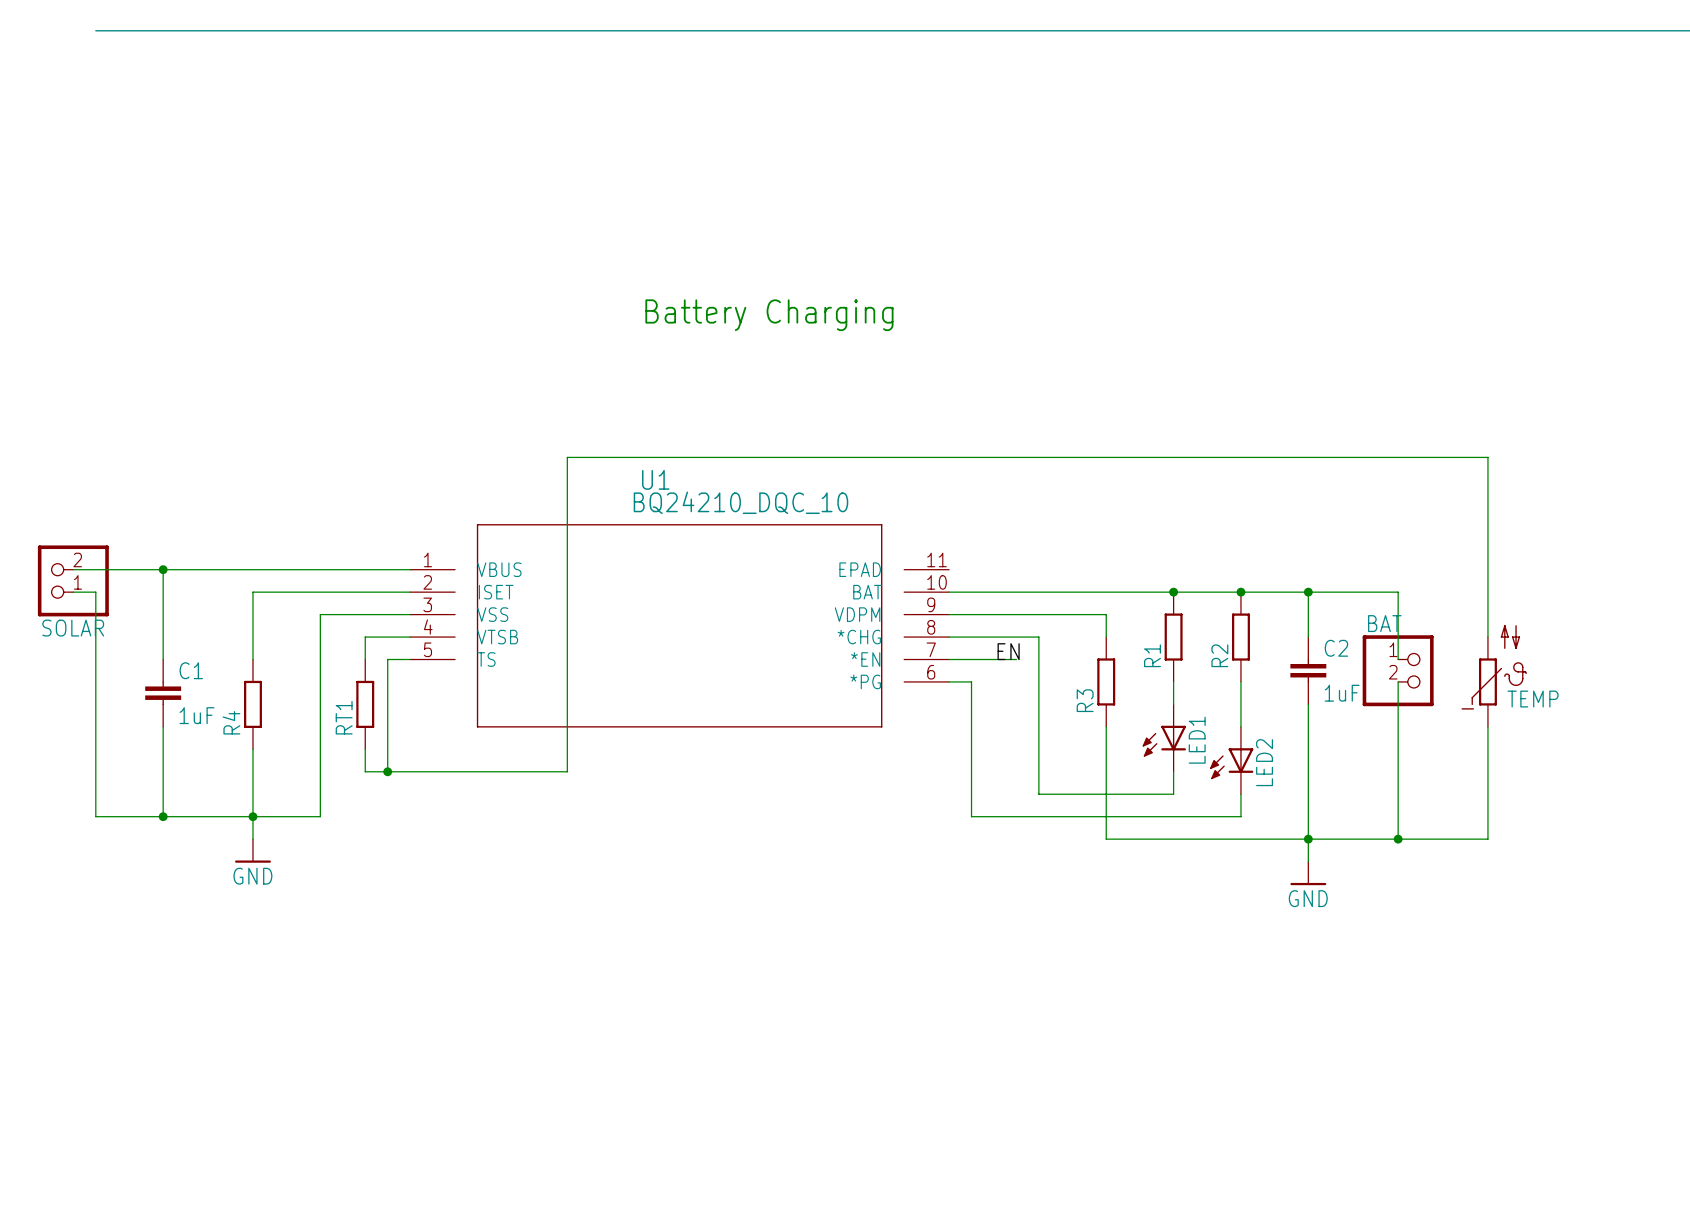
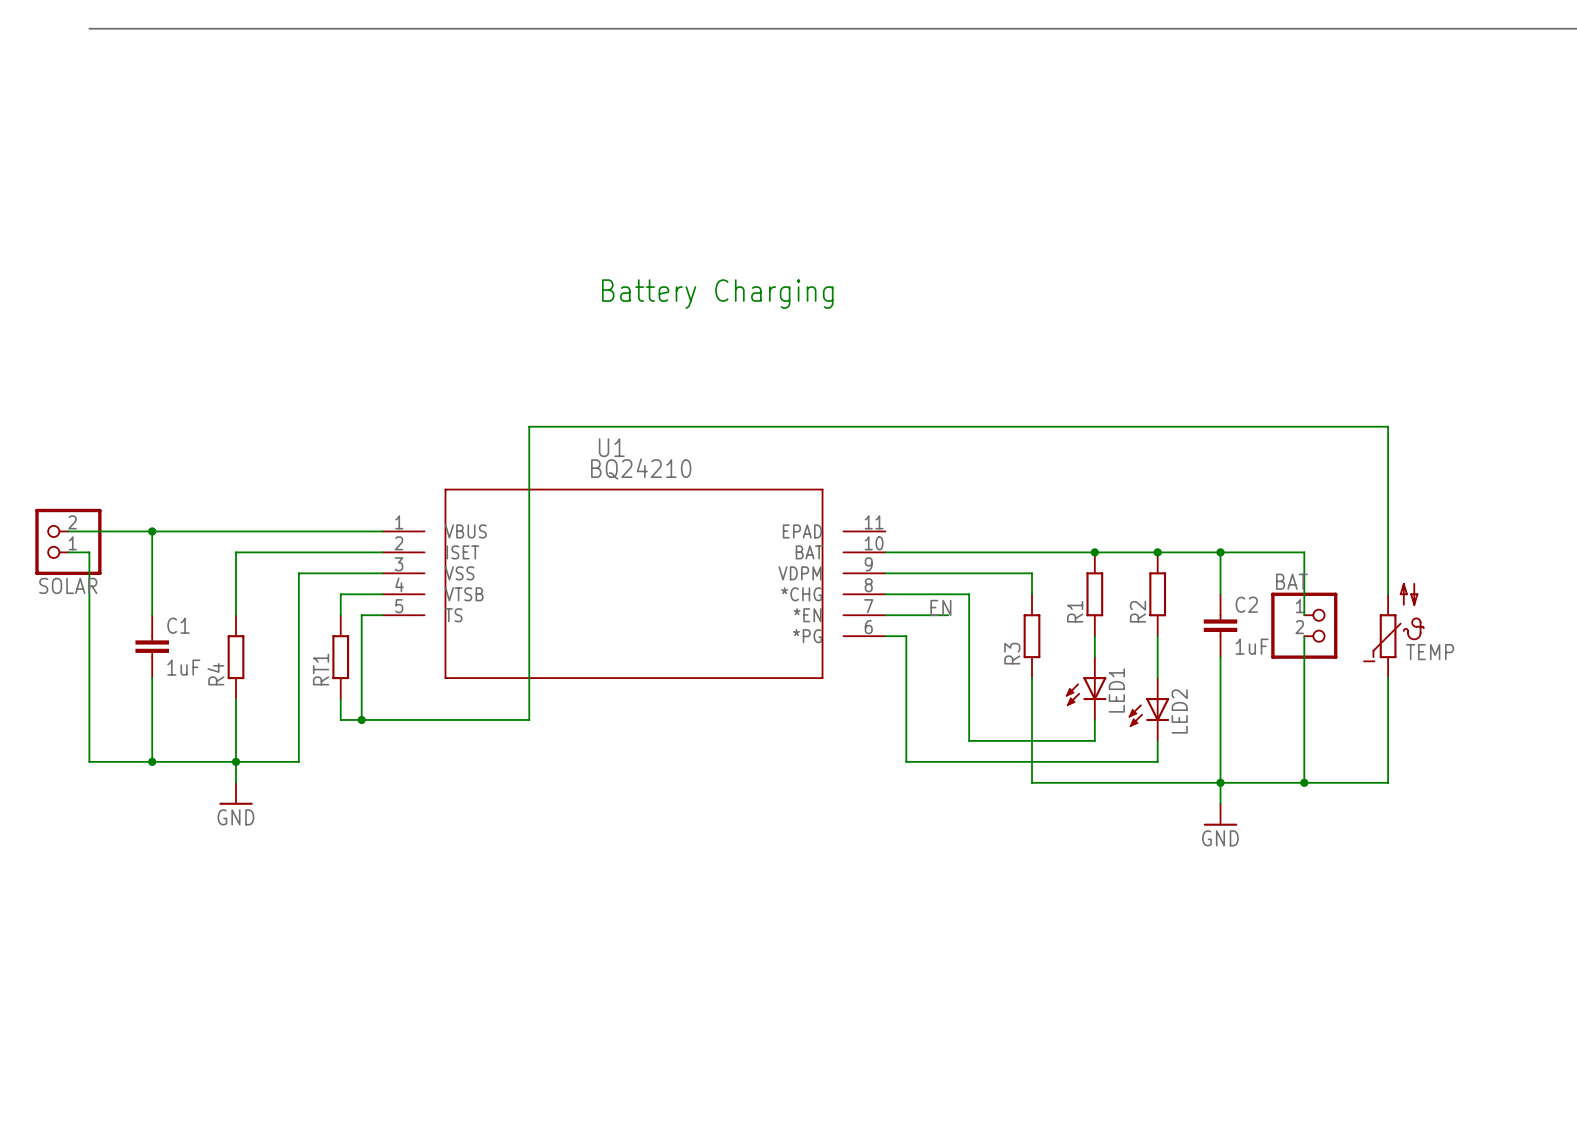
U1 value: BQ24210_DQC_10 (740, 502) -> BQ24210 (641, 469)

